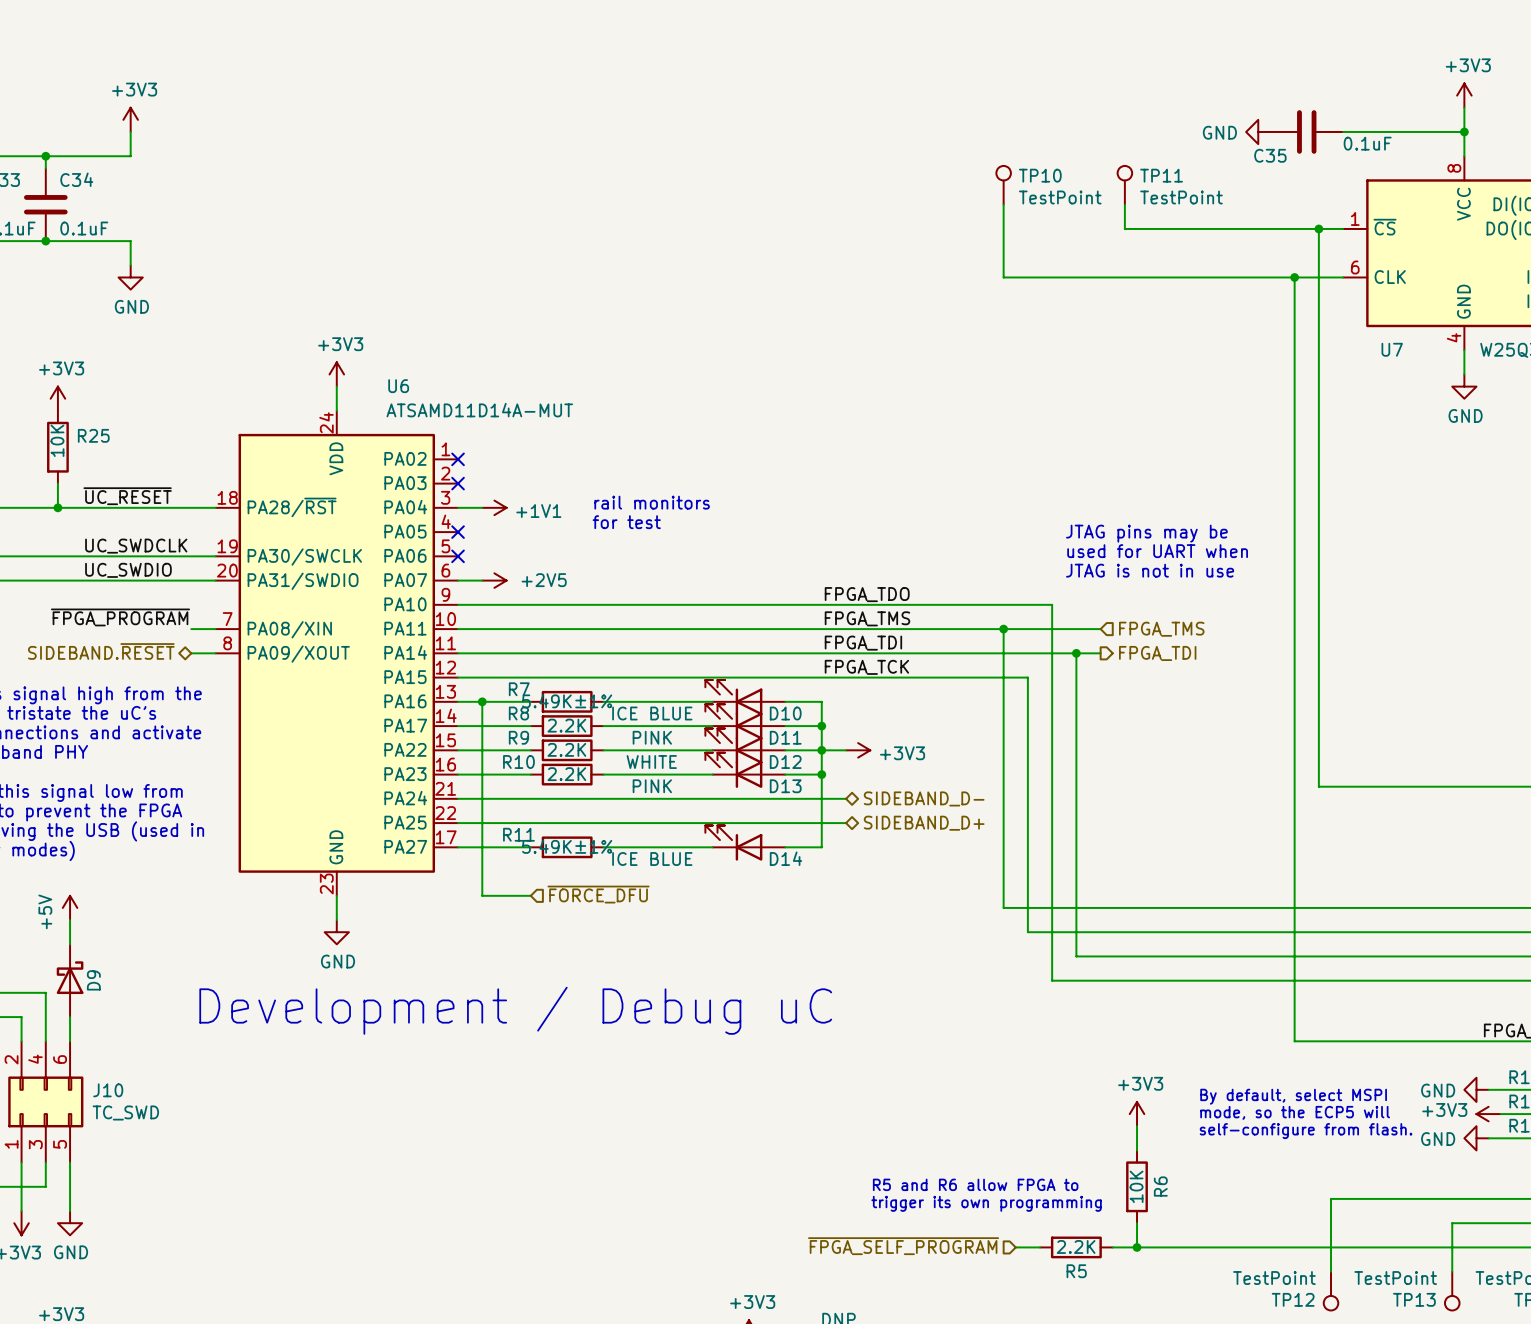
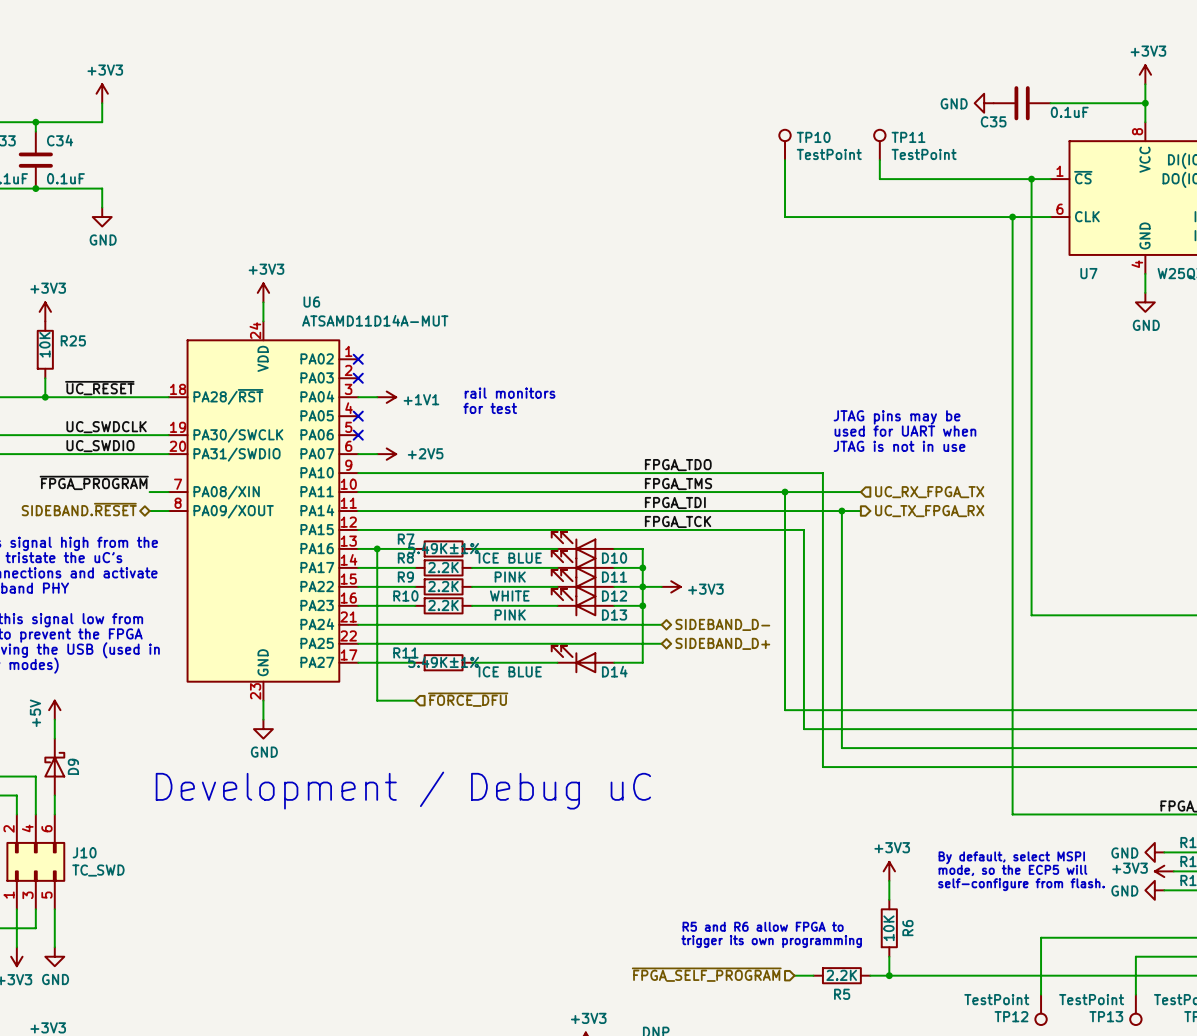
hierarchical label: FPGA_TMS (1161, 629) -> UC_RX_FPGA_TX (929, 492)
hierarchical label: FPGA_TDI (1157, 653) -> UC_TX_FPGA_RX (929, 511)

